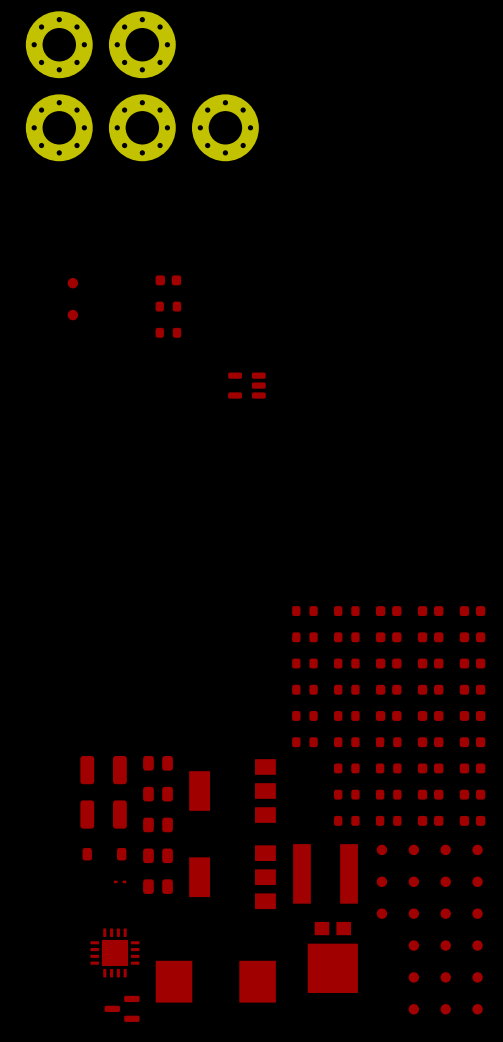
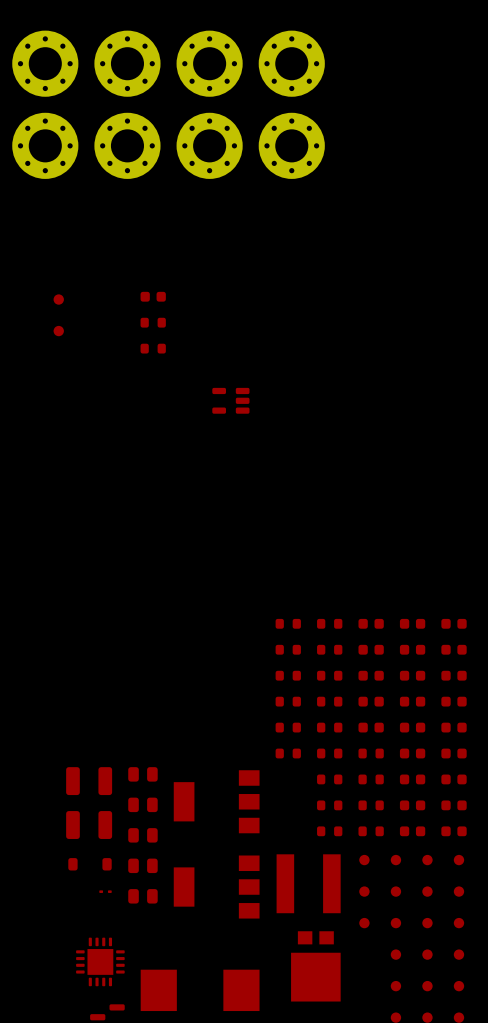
part: none -> (209, 63)
part: none -> (291, 63)
part: none -> (291, 145)

